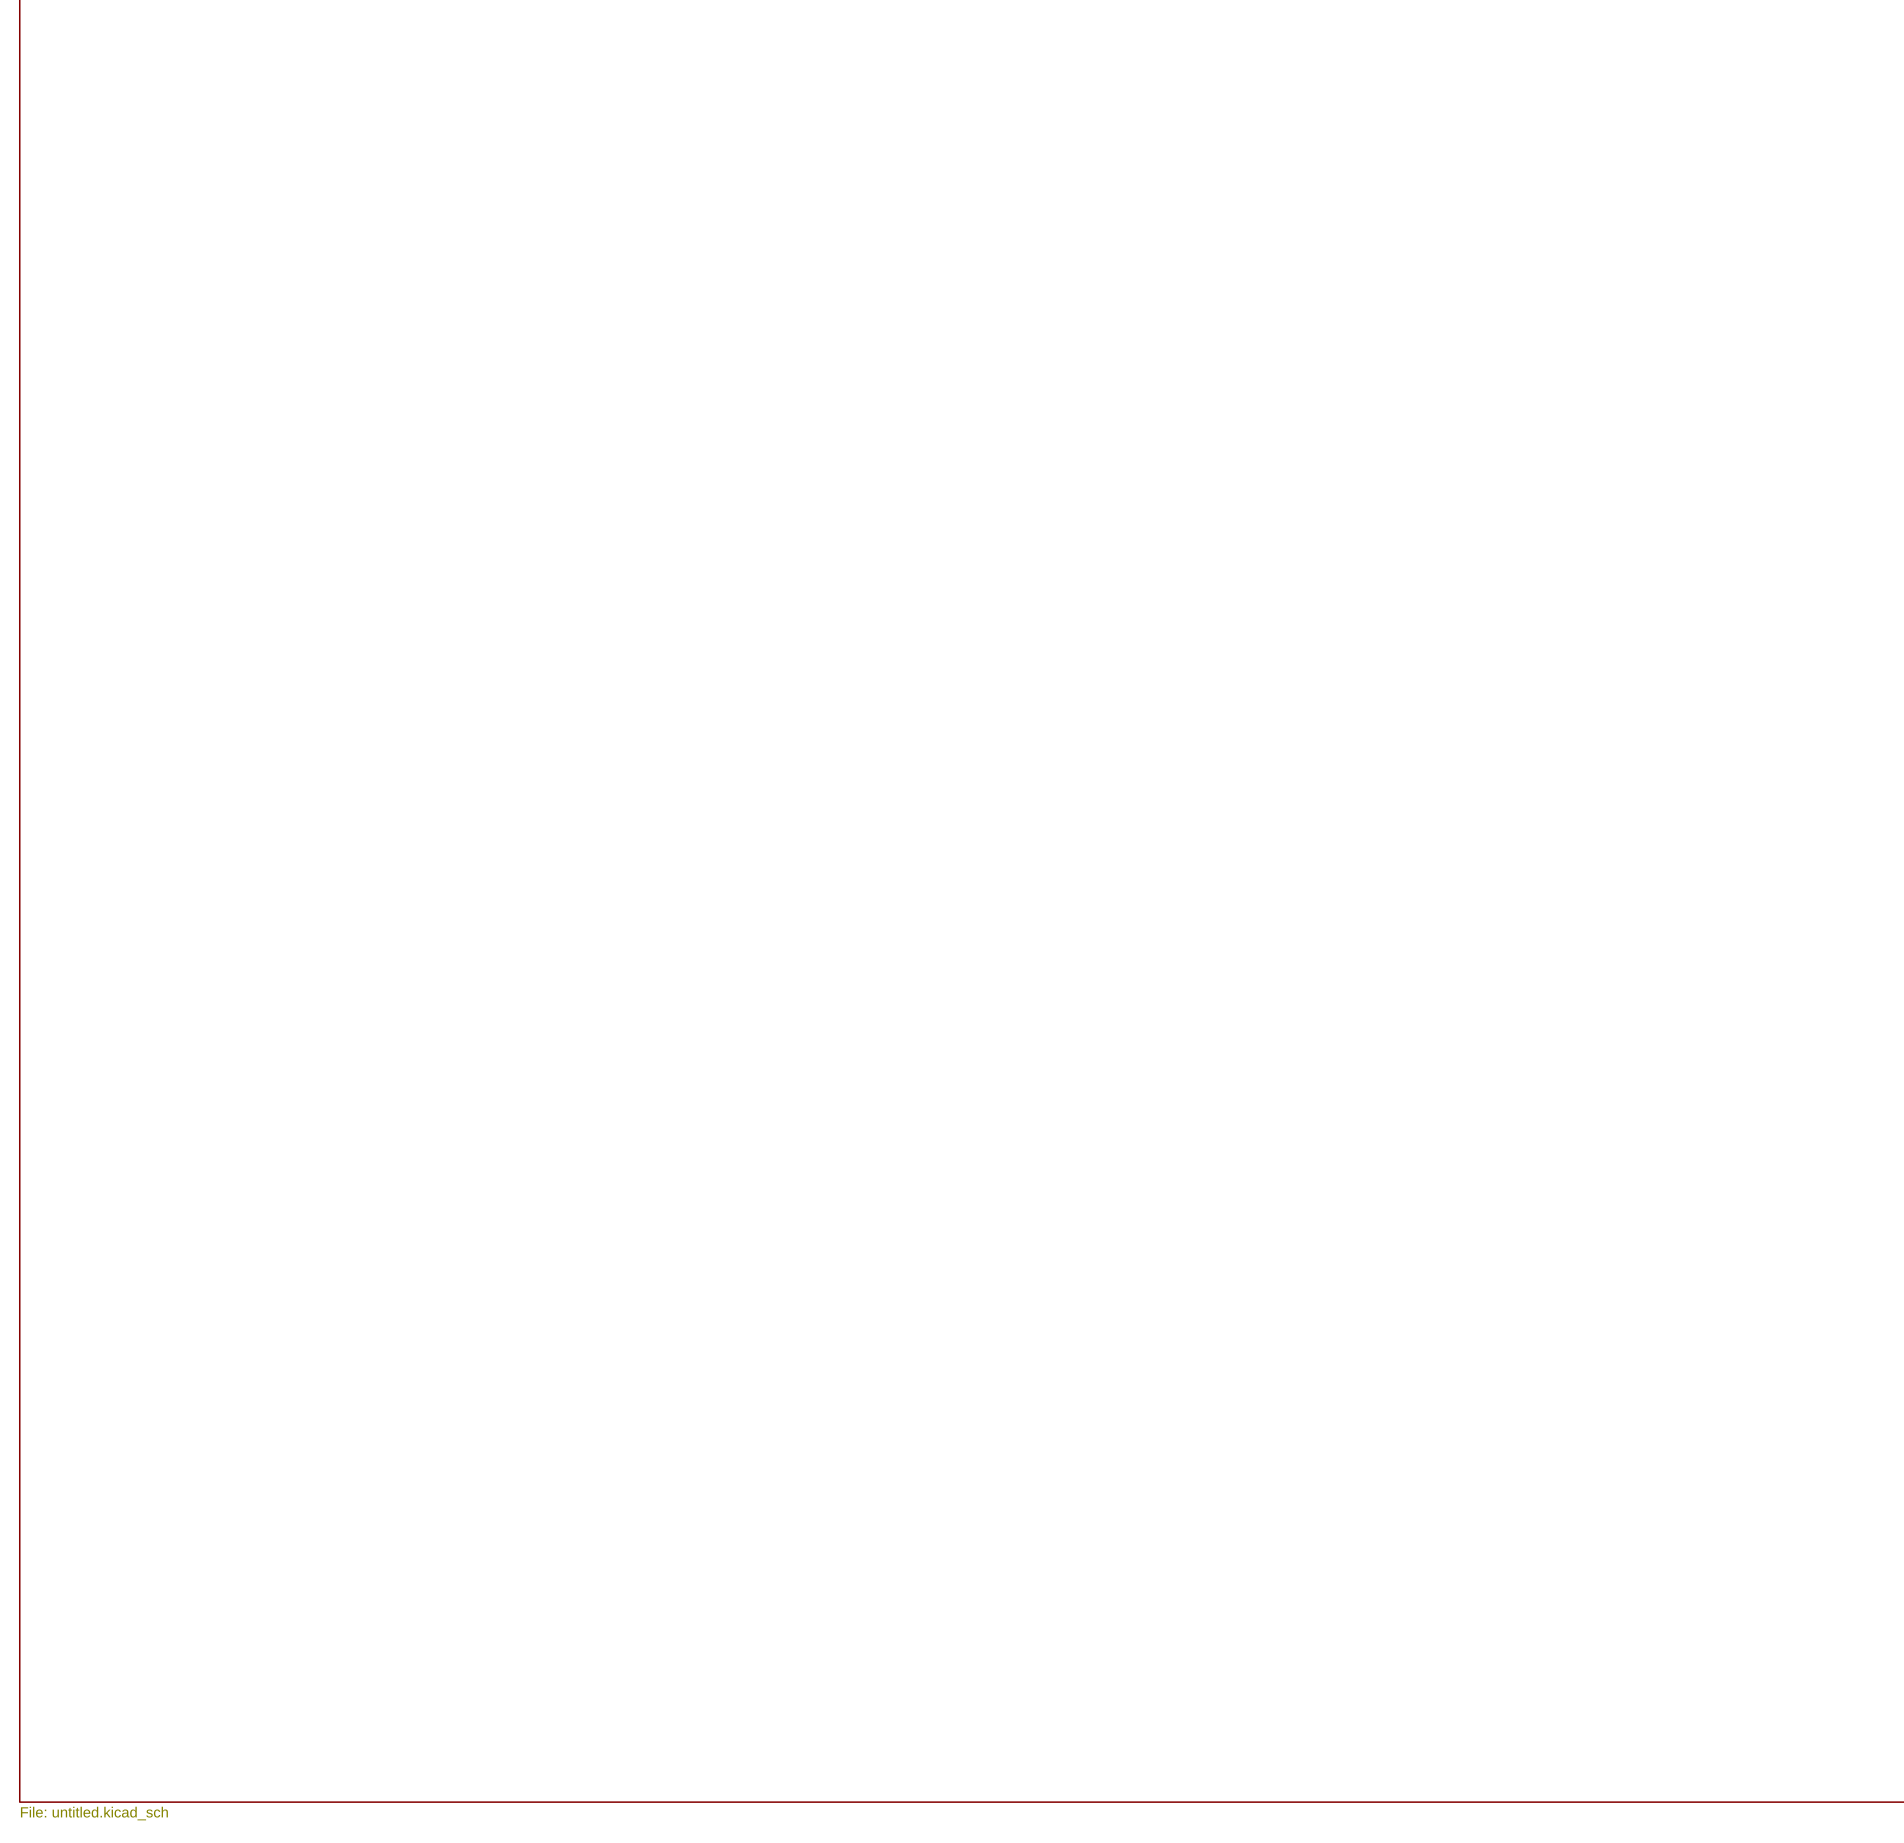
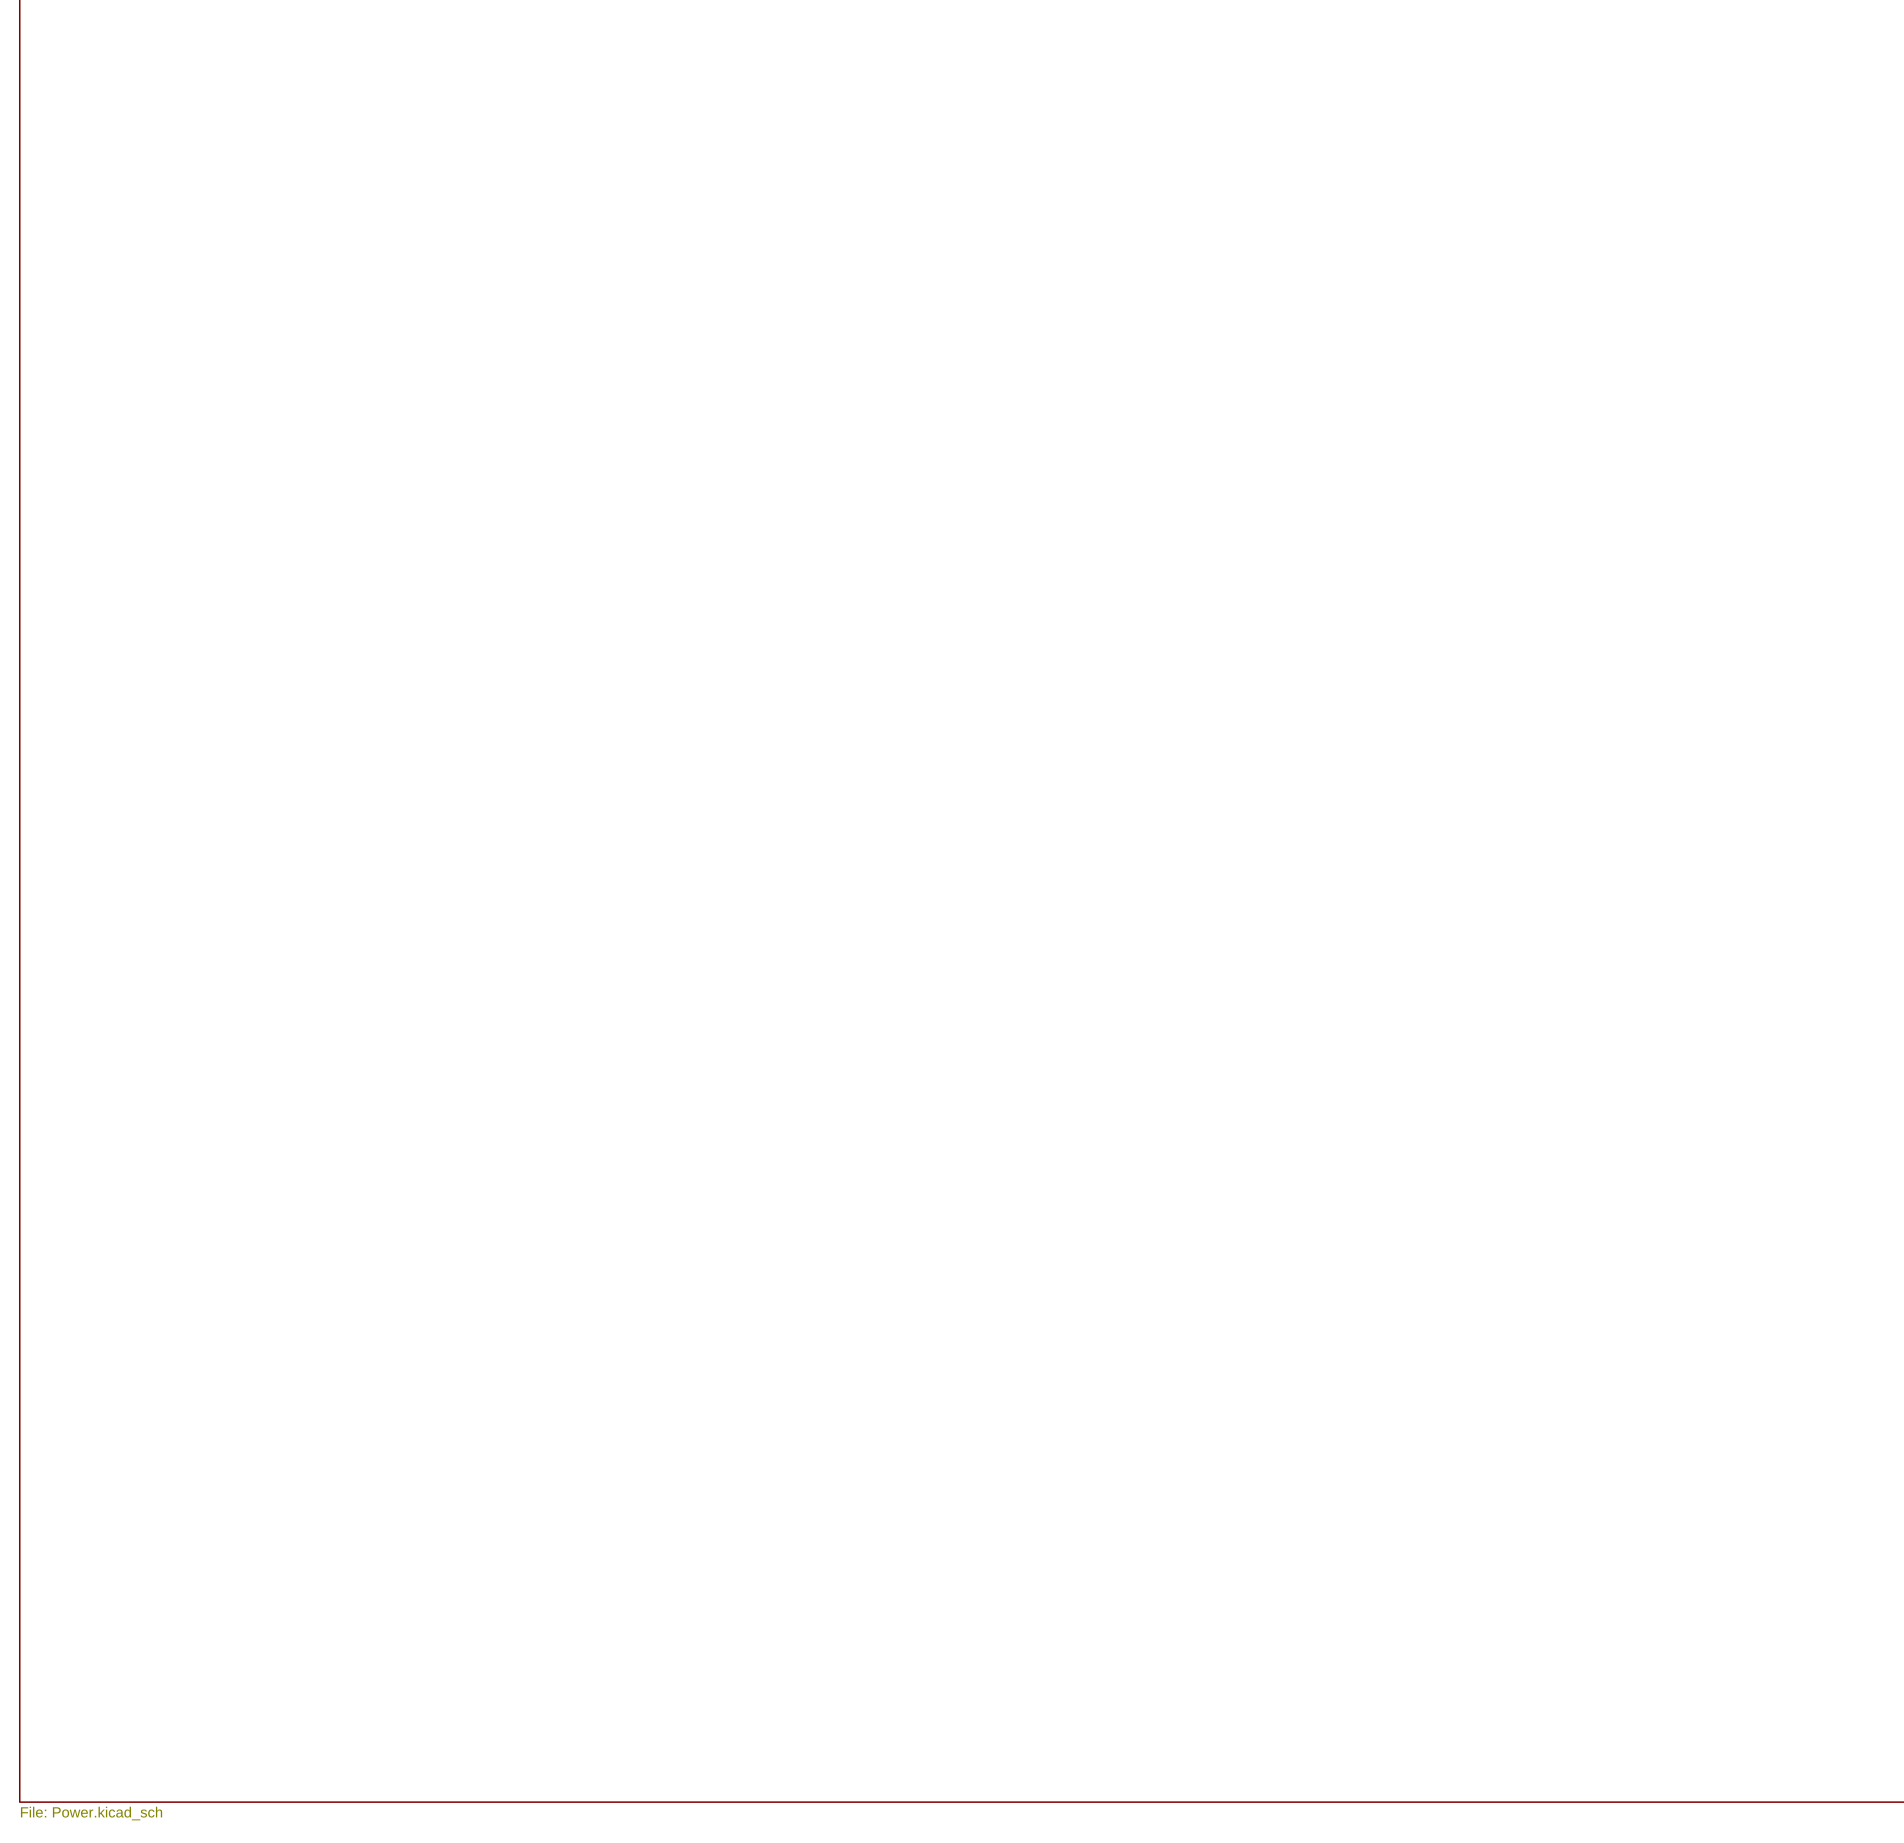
sheet value: File: untitled.kicad_sch (94, 1813) -> File: Power.kicad_sch (91, 1813)

